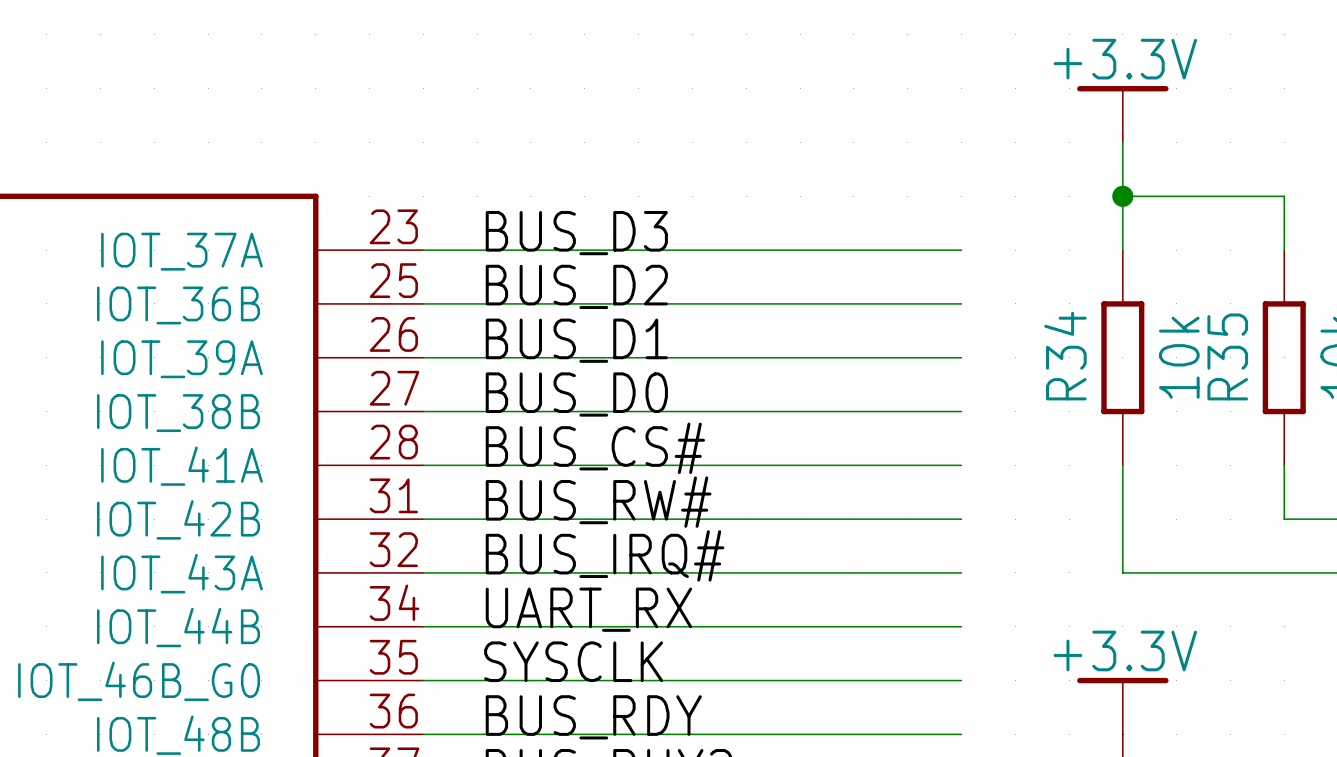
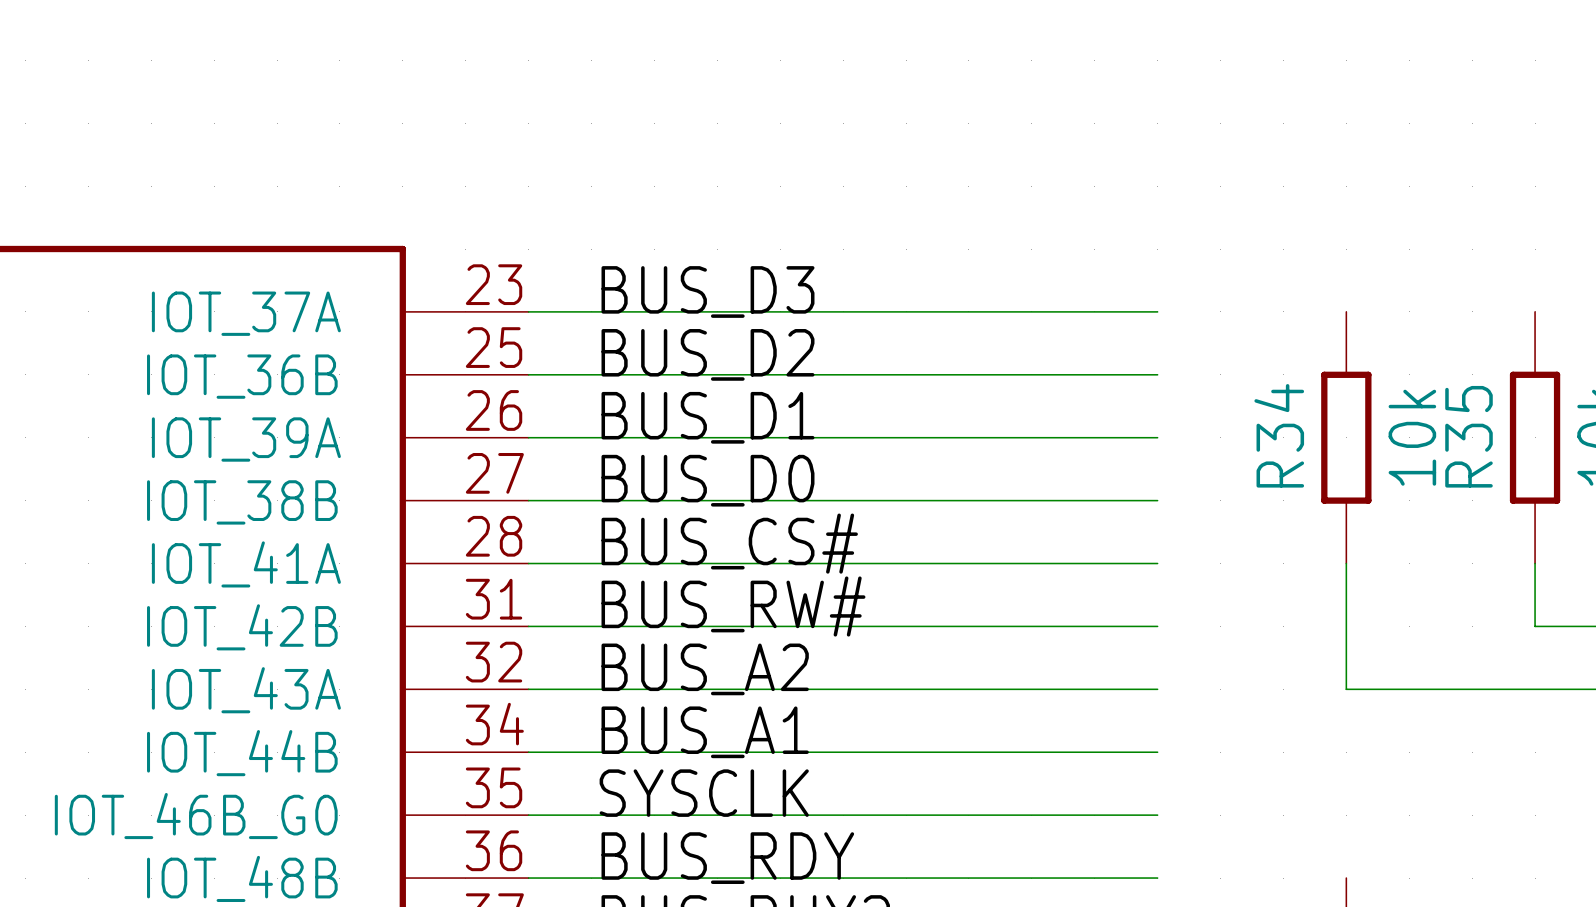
power symbol: +3.3V (1122, 114) -> none
wire: (1122, 142) (1122, 250) -> none
wire: (1122, 196) (1284, 196) (1284, 250) -> none
junction: (1122, 196) -> none
label: BUS_IRQ# (605, 555) -> BUS_A2 (705, 669)
label: UART_RX (588, 609) -> BUS_A1 (705, 732)
power symbol: +3.3V (1122, 706) -> none

